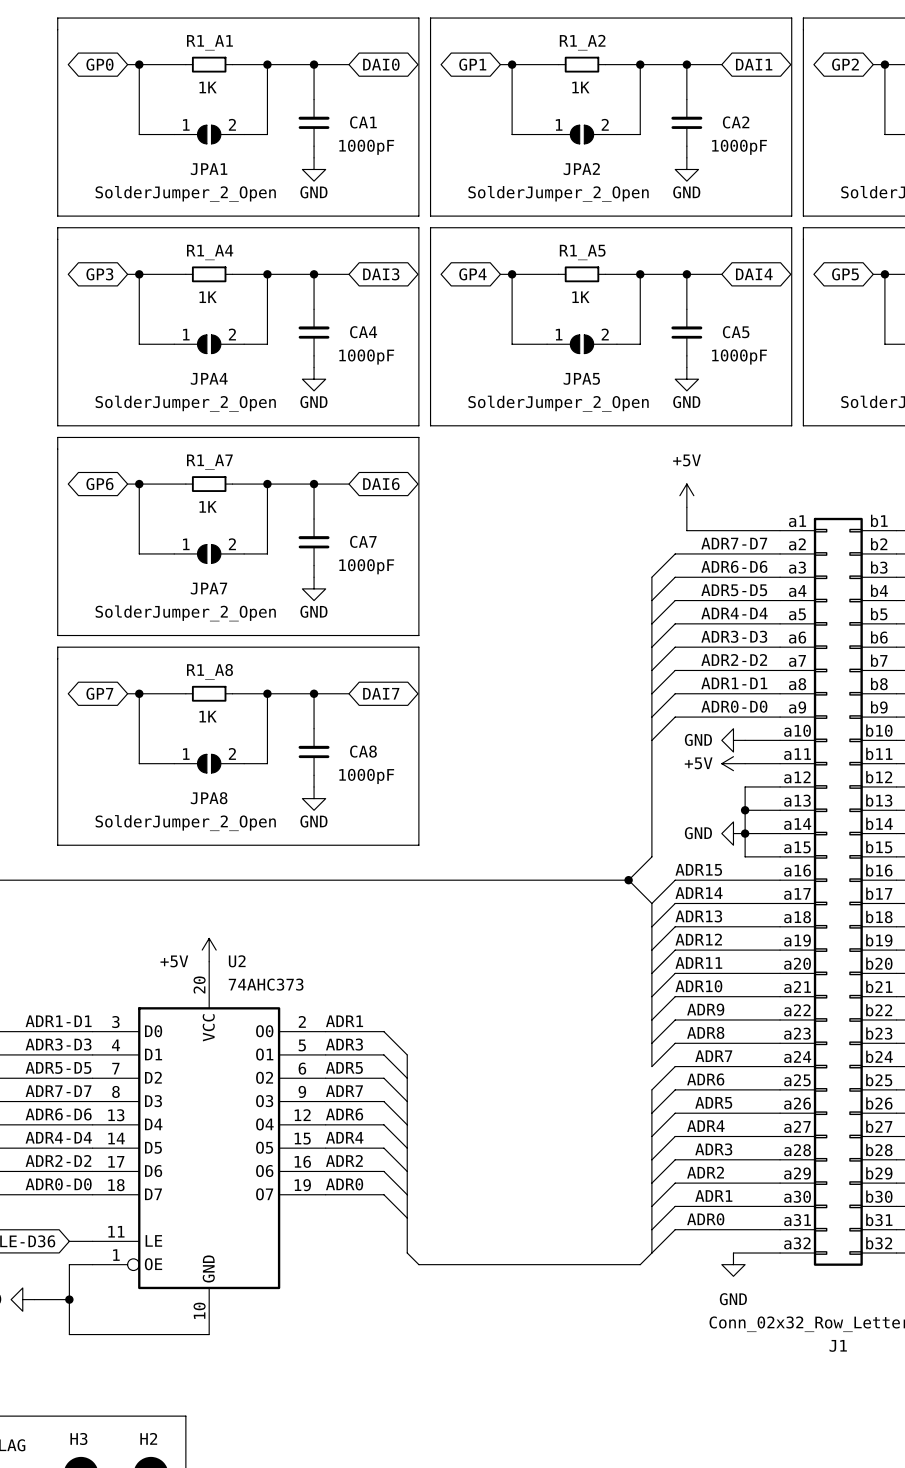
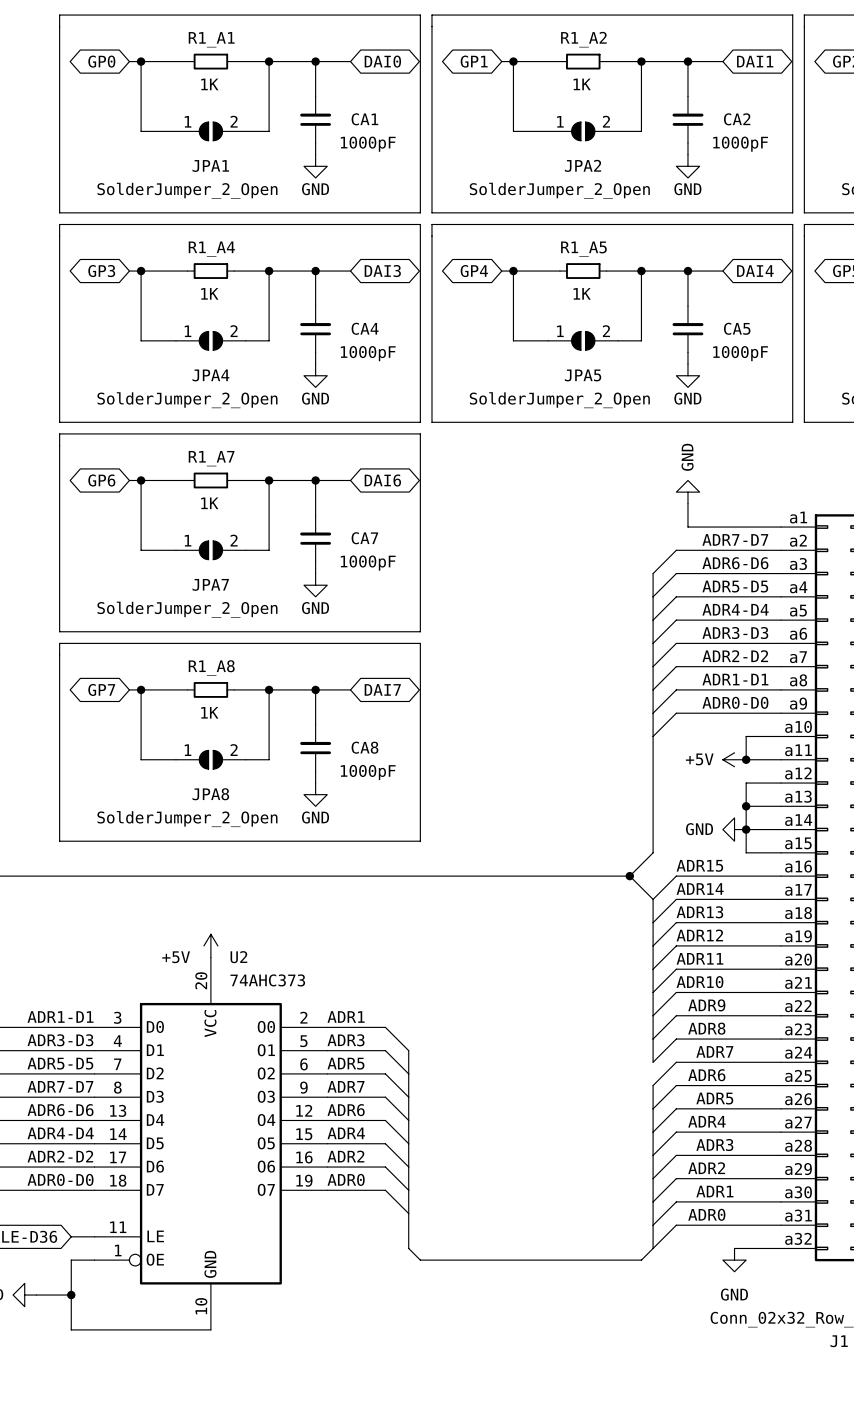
power symbol: +5V (686, 495) -> GND (687, 492)
power symbol: GND (733, 740) -> none
wire: none -> (746, 736) (746, 759)
junction: none -> (746, 759)

